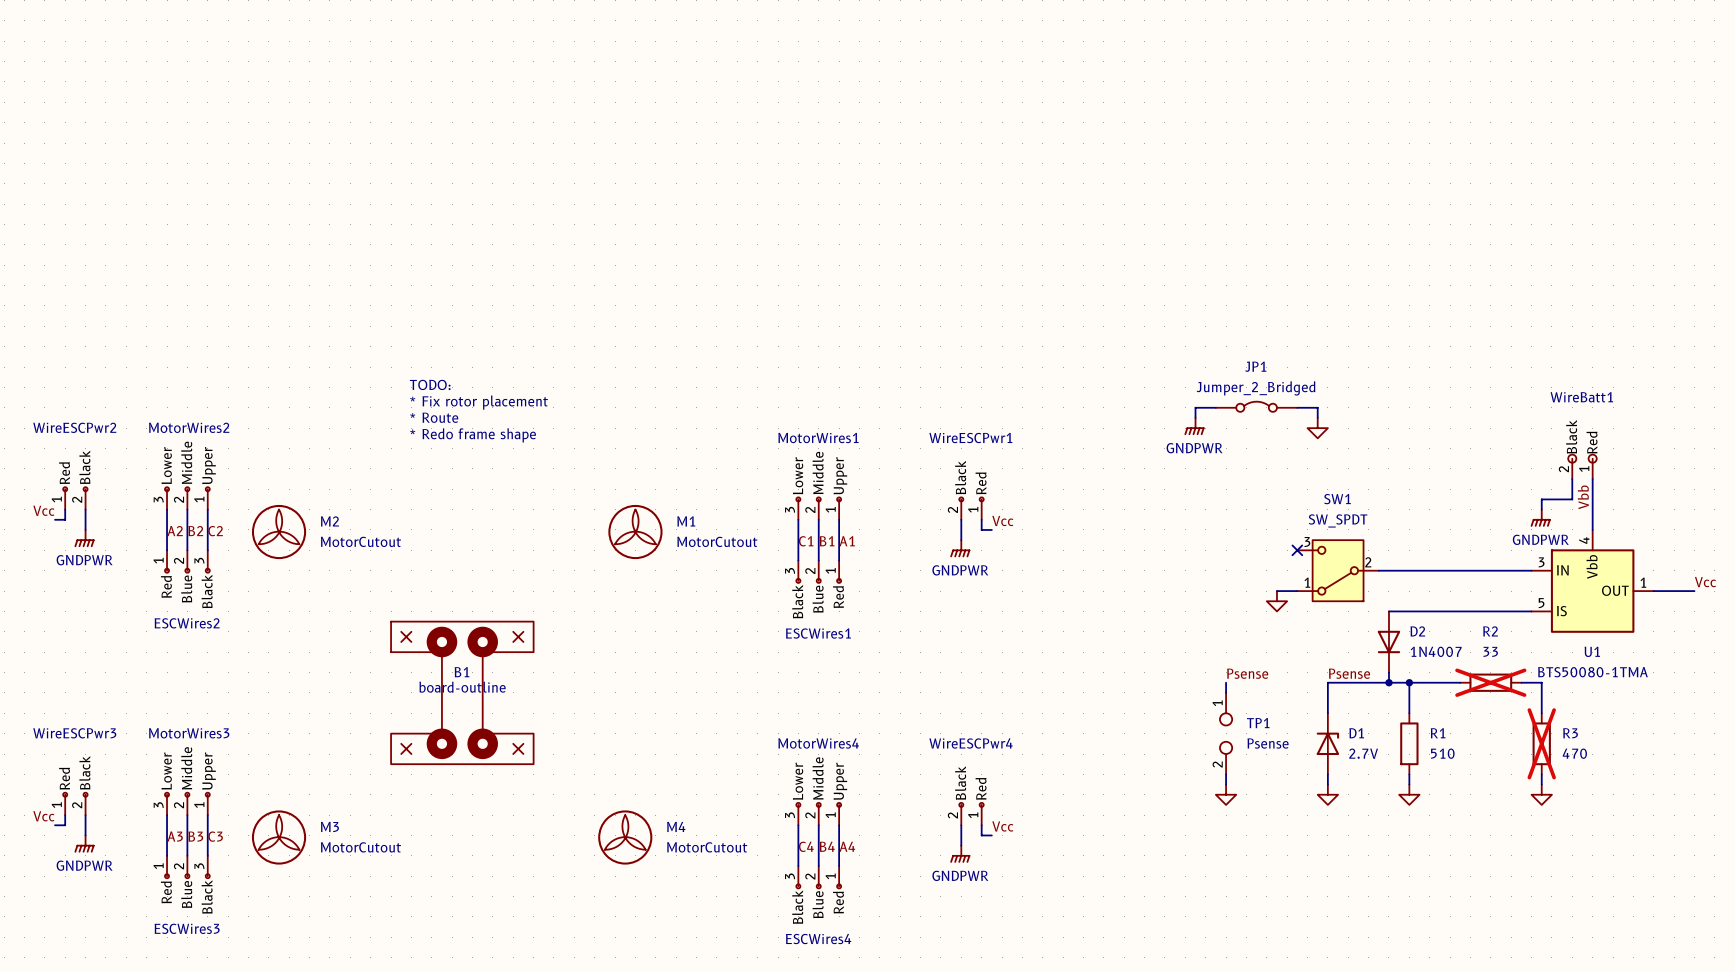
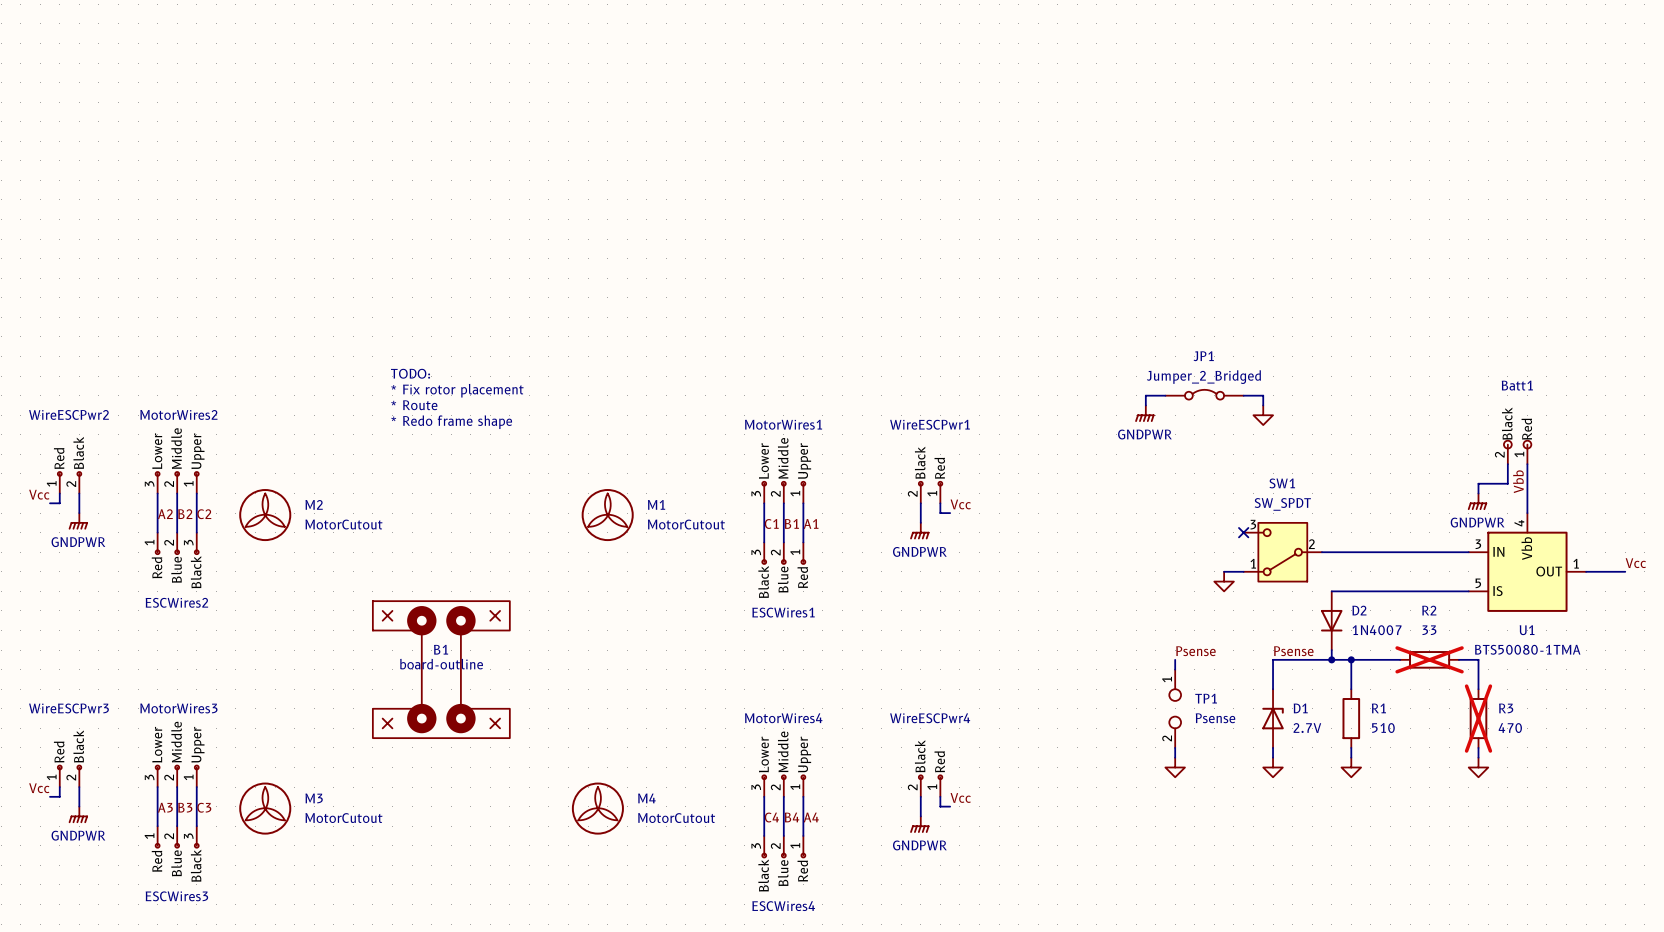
WireBatt1 name: WireBatt1 (1581, 397) -> Batt1 (1517, 385)

